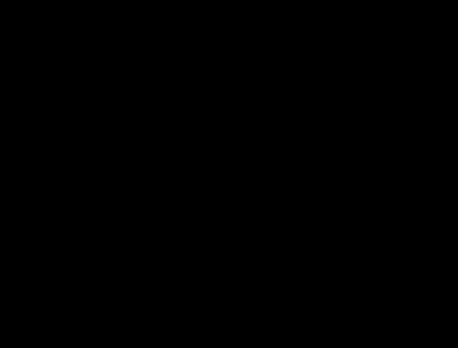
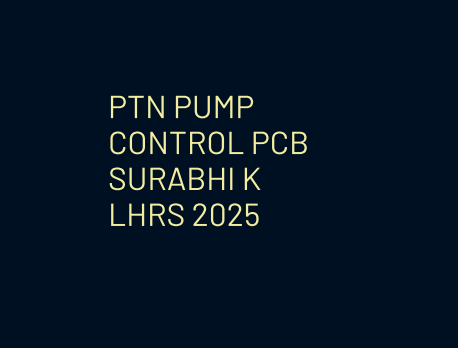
text: none -> PTN PUMP (182, 107)
text: none -> CONTROL PCB (208, 142)
text: none -> SURABHI K (185, 178)
text: none -> LHRS 2025 (184, 214)

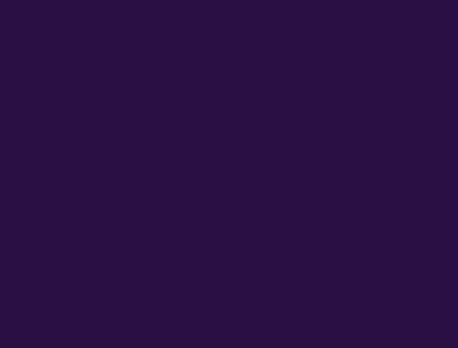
text: PTN PUMP (182, 107) -> none
text: CONTROL PCB (208, 142) -> none
text: SURABHI K (185, 178) -> none
text: LHRS 2025 (184, 214) -> none

